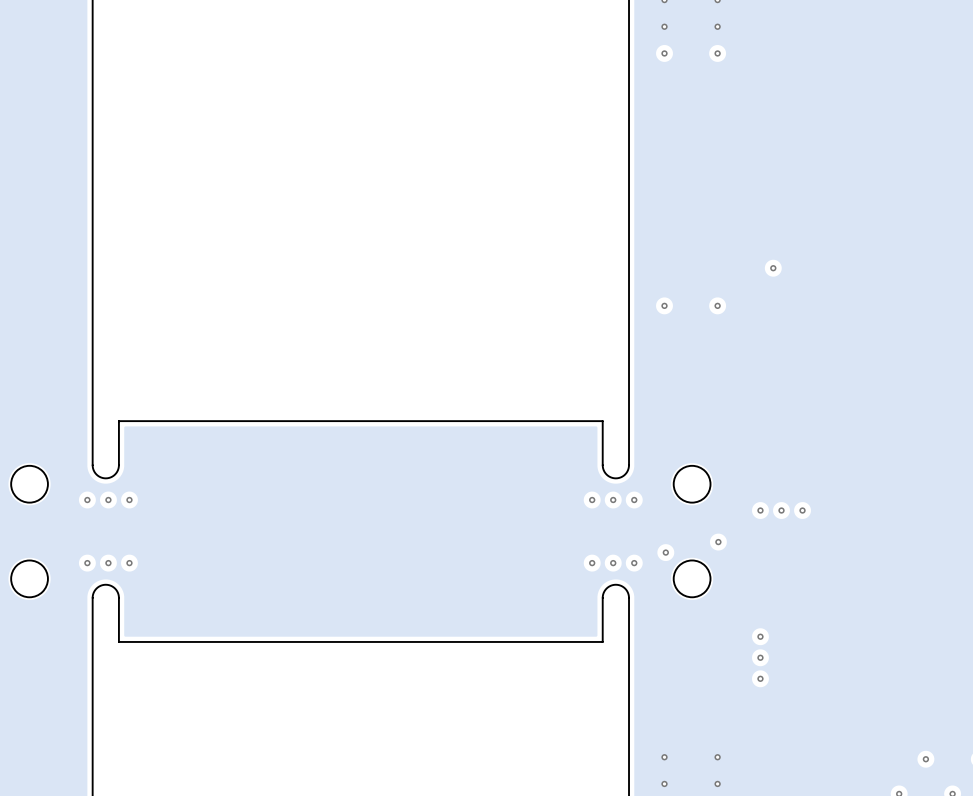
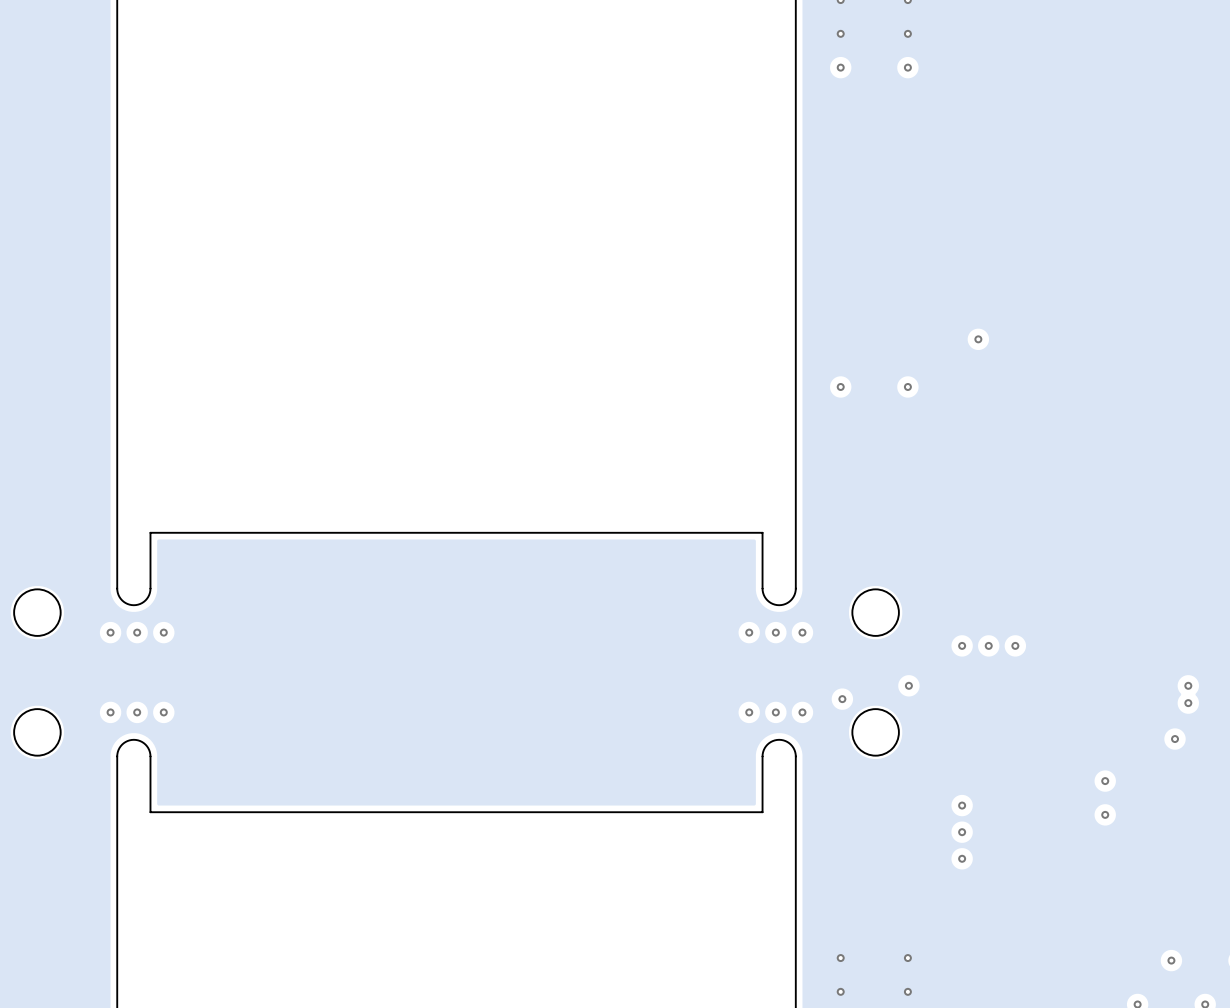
via: none -> (1188, 685)
via: none -> (1188, 703)
via: none -> (1175, 739)
via: none -> (1105, 781)
via: none -> (1105, 814)

